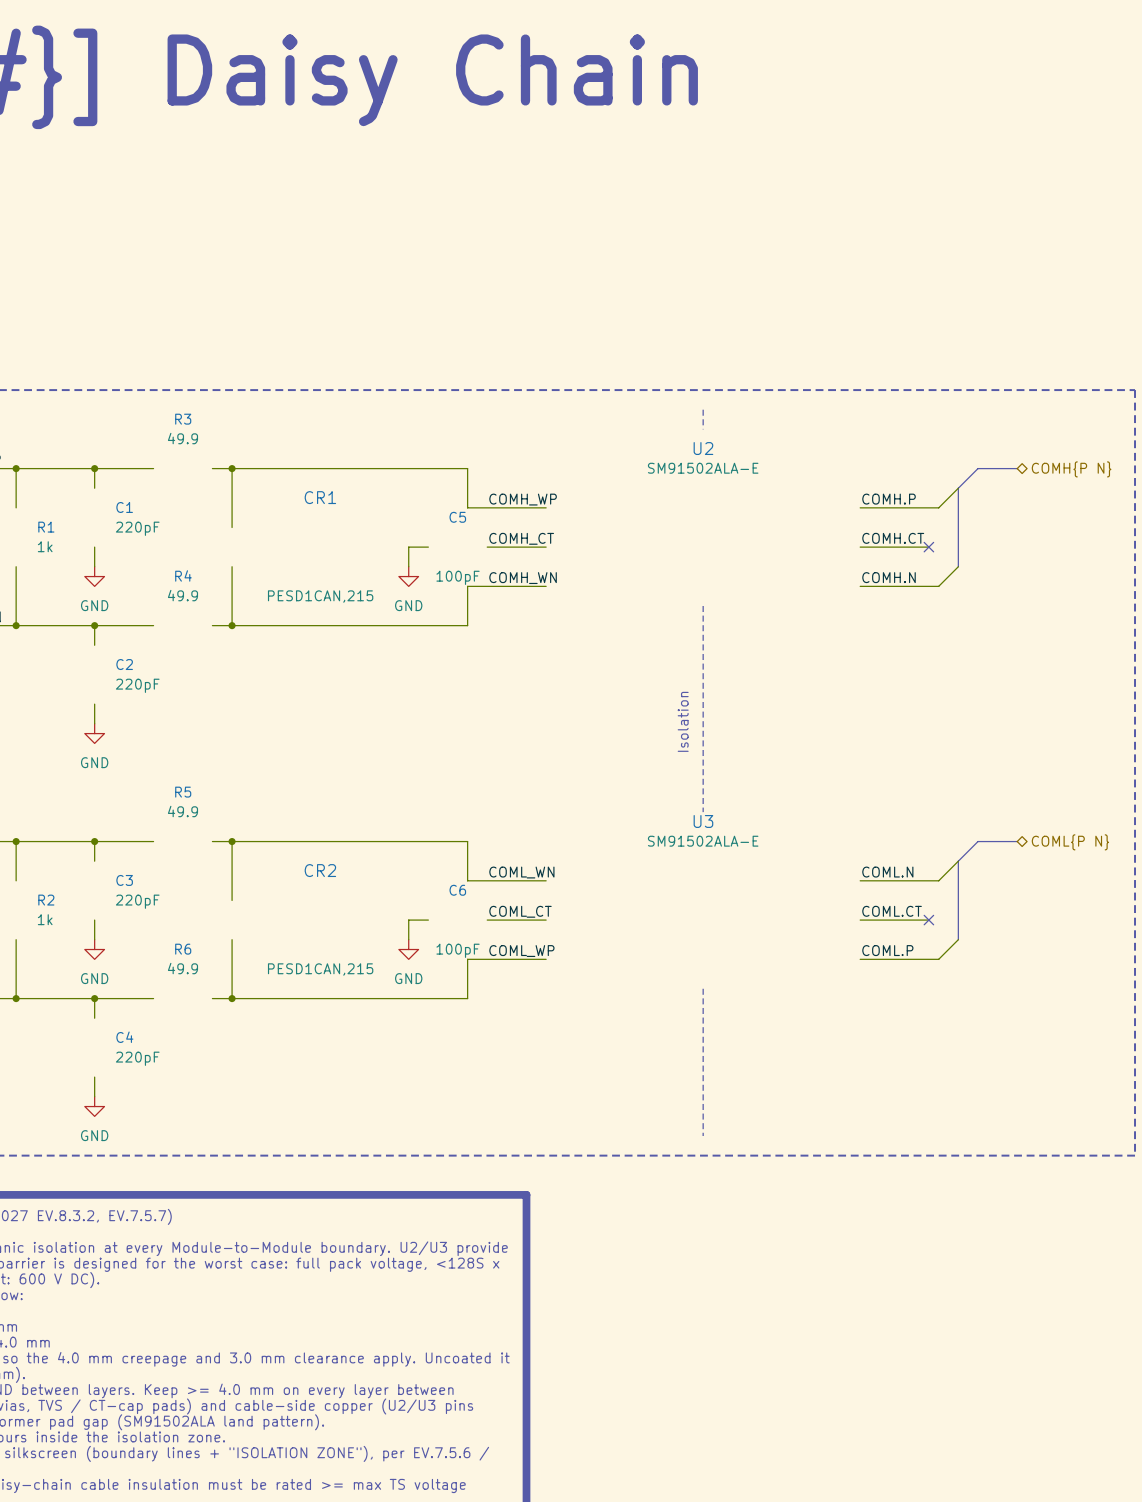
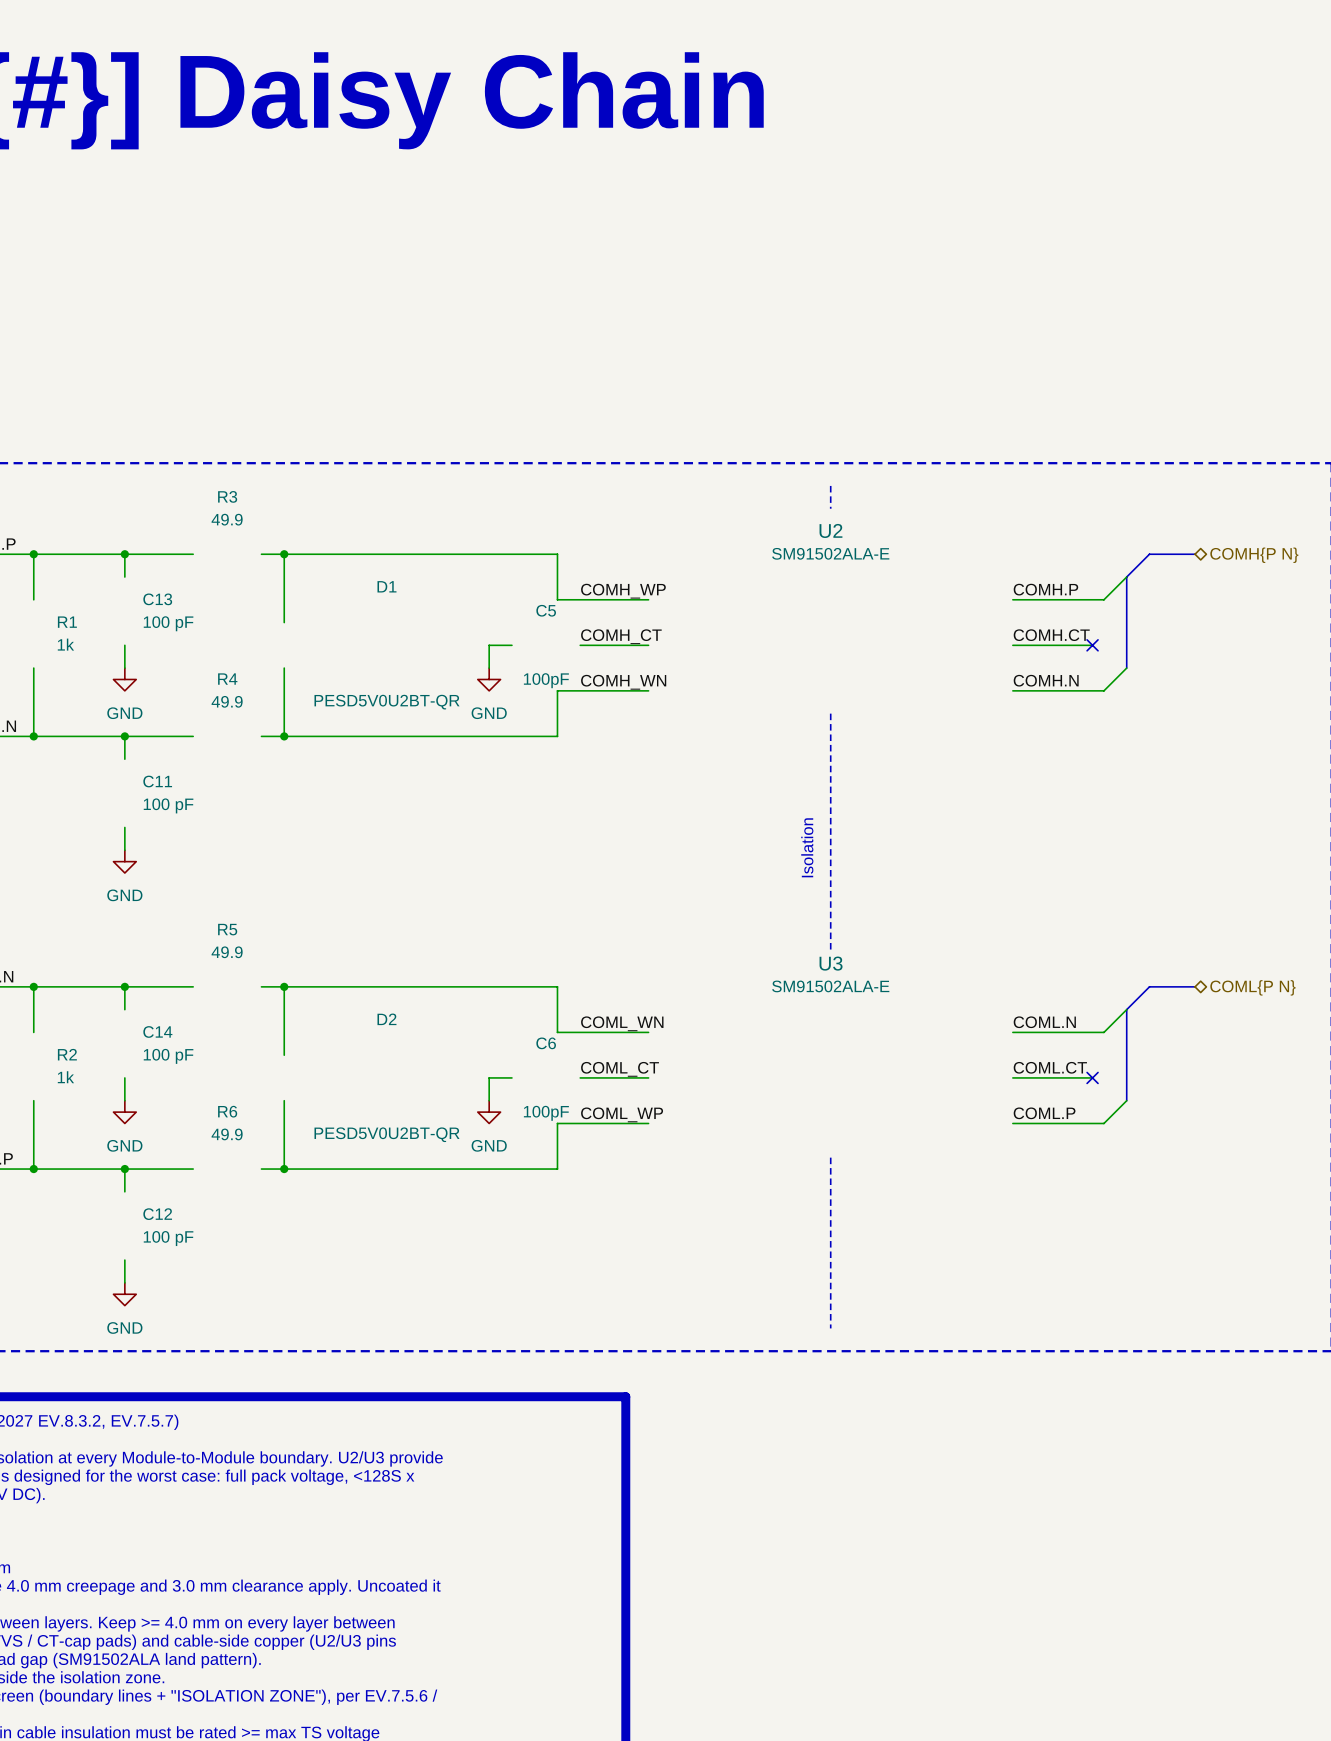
CR1 name: CR1 (320, 497) -> D1 (386, 586)
C1 name: C1 (124, 507) -> C13 (157, 599)
C1 value: 220pF (137, 528) -> 100 pF (168, 623)
CR1 value: PESD1CAN,215 (320, 596) -> PESD5V0U2BT-QR (387, 702)
C2 name: C2 (124, 664) -> C11 (157, 781)
C2 value: 220pF (137, 685) -> 100 pF (168, 805)
CR2 name: CR2 (320, 870) -> D2 (386, 1019)
C3 name: C3 (124, 880) -> C14 (157, 1031)
C3 value: 220pF (137, 901) -> 100 pF (168, 1056)
CR2 value: PESD1CAN,215 (320, 969) -> PESD5V0U2BT-QR (387, 1134)
C4 name: C4 (124, 1037) -> C12 (157, 1214)
C4 value: 220pF (137, 1058) -> 100 pF (168, 1238)

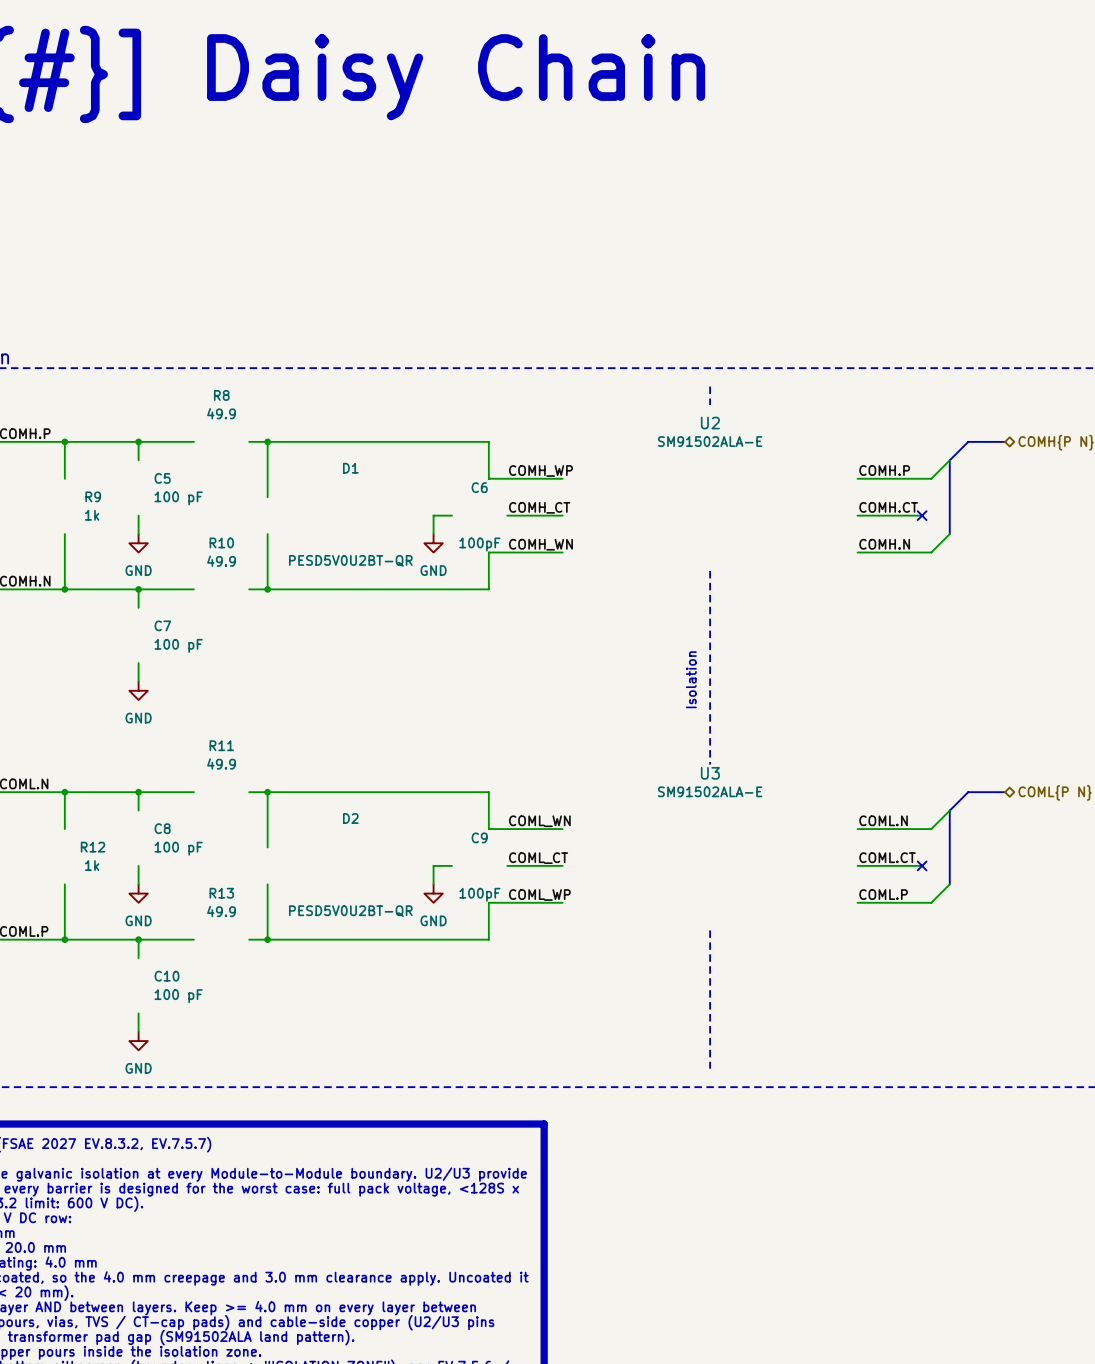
R3 name: R3 (227, 496) -> R8 (221, 395)
C13 name: C13 (157, 599) -> C5 (162, 478)
C5 name: C5 (546, 610) -> C6 (479, 487)
R1 name: R1 (67, 622) -> R9 (93, 496)
R4 name: R4 (227, 679) -> R10 (221, 542)
C11 name: C11 (157, 781) -> C7 (162, 625)
R5 name: R5 (227, 929) -> R11 (221, 745)
C14 name: C14 (157, 1031) -> C8 (162, 828)
C6 name: C6 (546, 1043) -> C9 (479, 837)
R2 name: R2 (67, 1054) -> R12 (93, 847)
R6 name: R6 (227, 1111) -> R13 (221, 893)
C12 name: C12 (157, 1214) -> C10 (167, 976)

